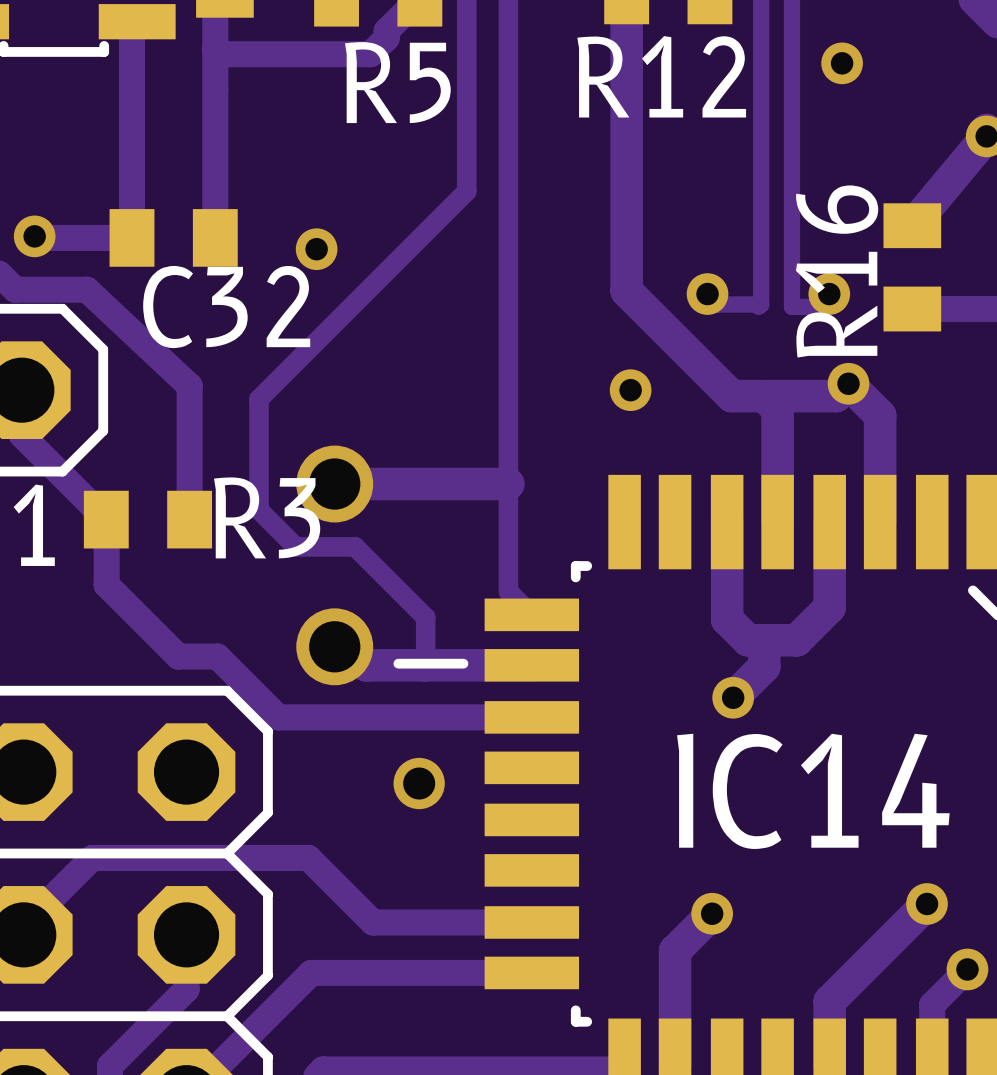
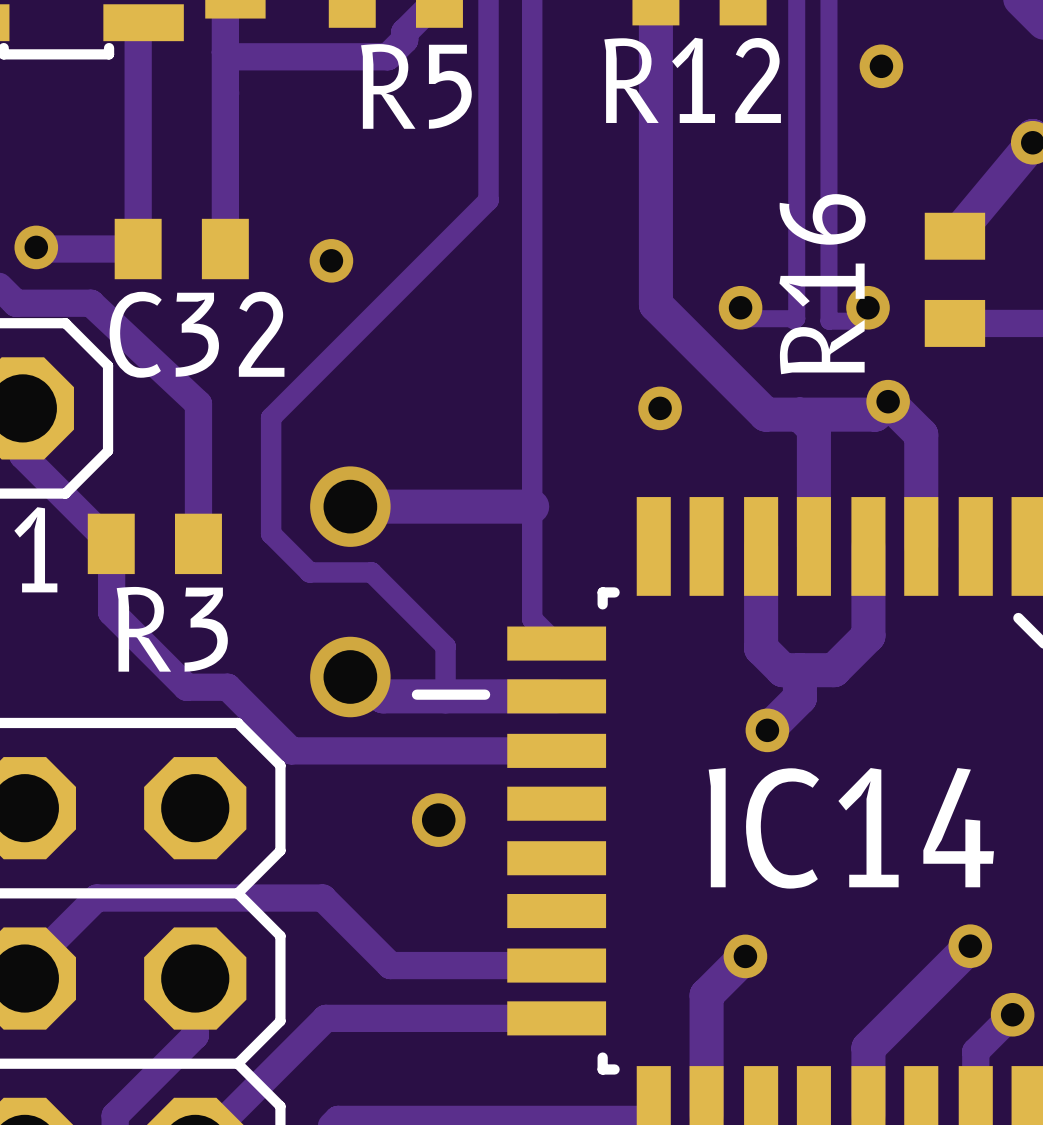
R16 name position: R16 (837, 271) -> R16 (822, 284)
C32 name position: C32 (226, 307) -> C32 (197, 334)
R3 name position: R3 (267, 517) -> R3 (172, 629)

